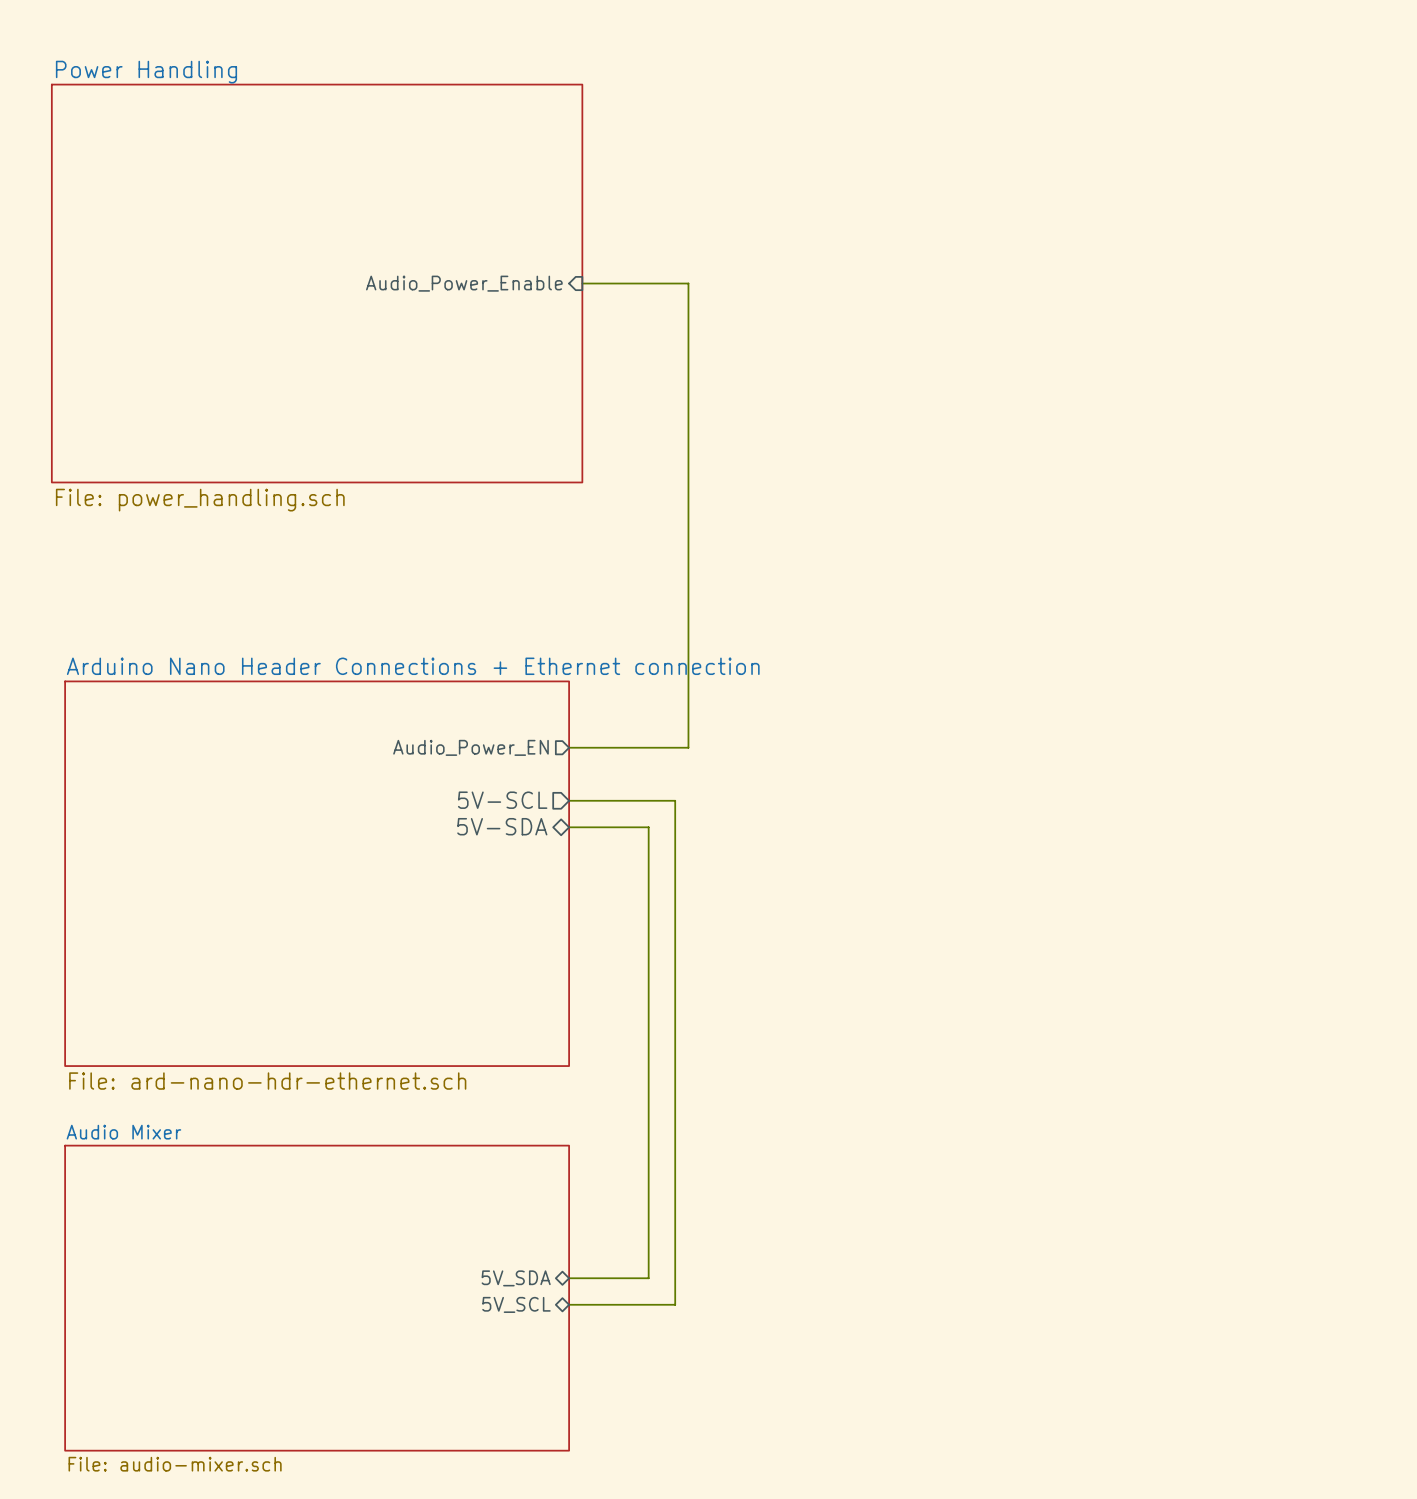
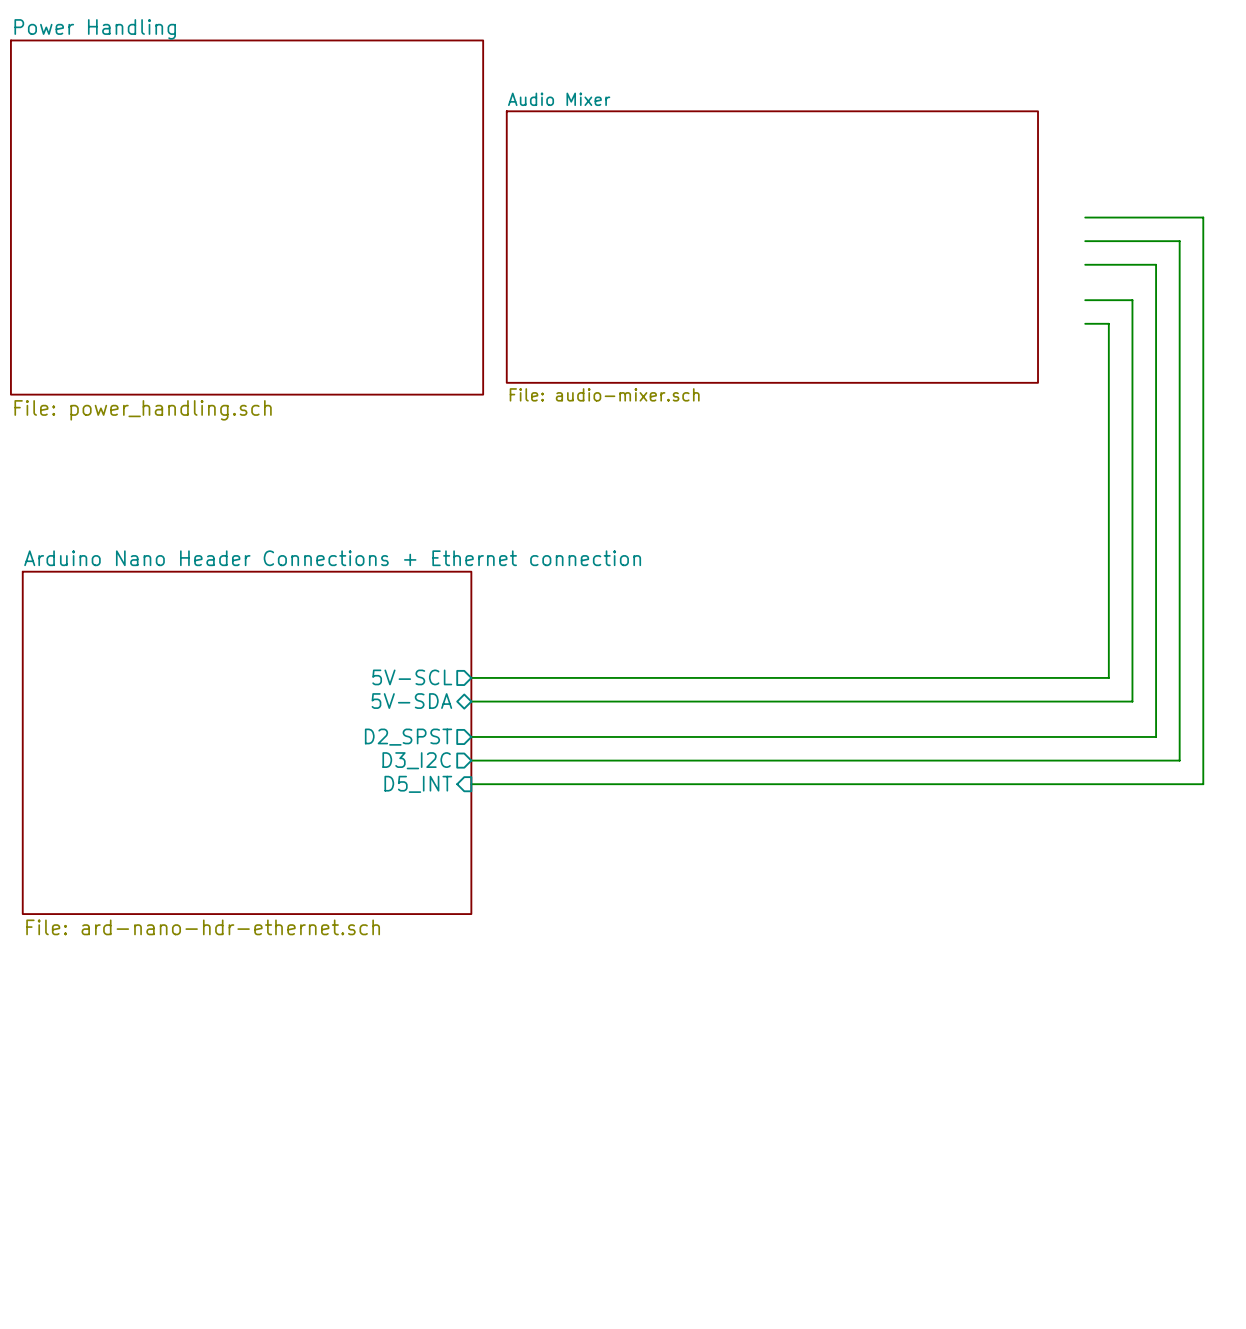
sheet pin: Audio_Power_Enable (464, 283) -> none
wire: (582, 283) (688, 283) (688, 747) (569, 747) -> none
wire: none -> (1085, 217) (1203, 217) (1203, 784) (471, 784)
wire: none -> (1085, 241) (1179, 241) (1179, 760) (471, 760)
sheet Audio Mixer: none -> File: audio-mixer.sch (772, 247)
wire: none -> (1085, 264) (1156, 264) (1156, 736) (471, 736)
sheet pin: Audio_Power_EN (470, 747) -> none
wire: (675, 800) (675, 1304) (569, 1304) -> (565, 677) (1108, 677) (1108, 323) (1085, 323)
wire: (648, 827) (648, 1278) (569, 1278) -> (542, 701) (1132, 701) (1132, 300) (1085, 300)
sheet pin: none -> D2_SPST (408, 737)
sheet pin: none -> D3_I2C (416, 760)
sheet pin: none -> D5_INT (418, 784)
sheet pin: 5V_SDA (516, 1278) -> none
sheet Audio Mixer: File: audio-mixer.sch (317, 1298) -> none
sheet pin: 5V_SCL (516, 1304) -> none

